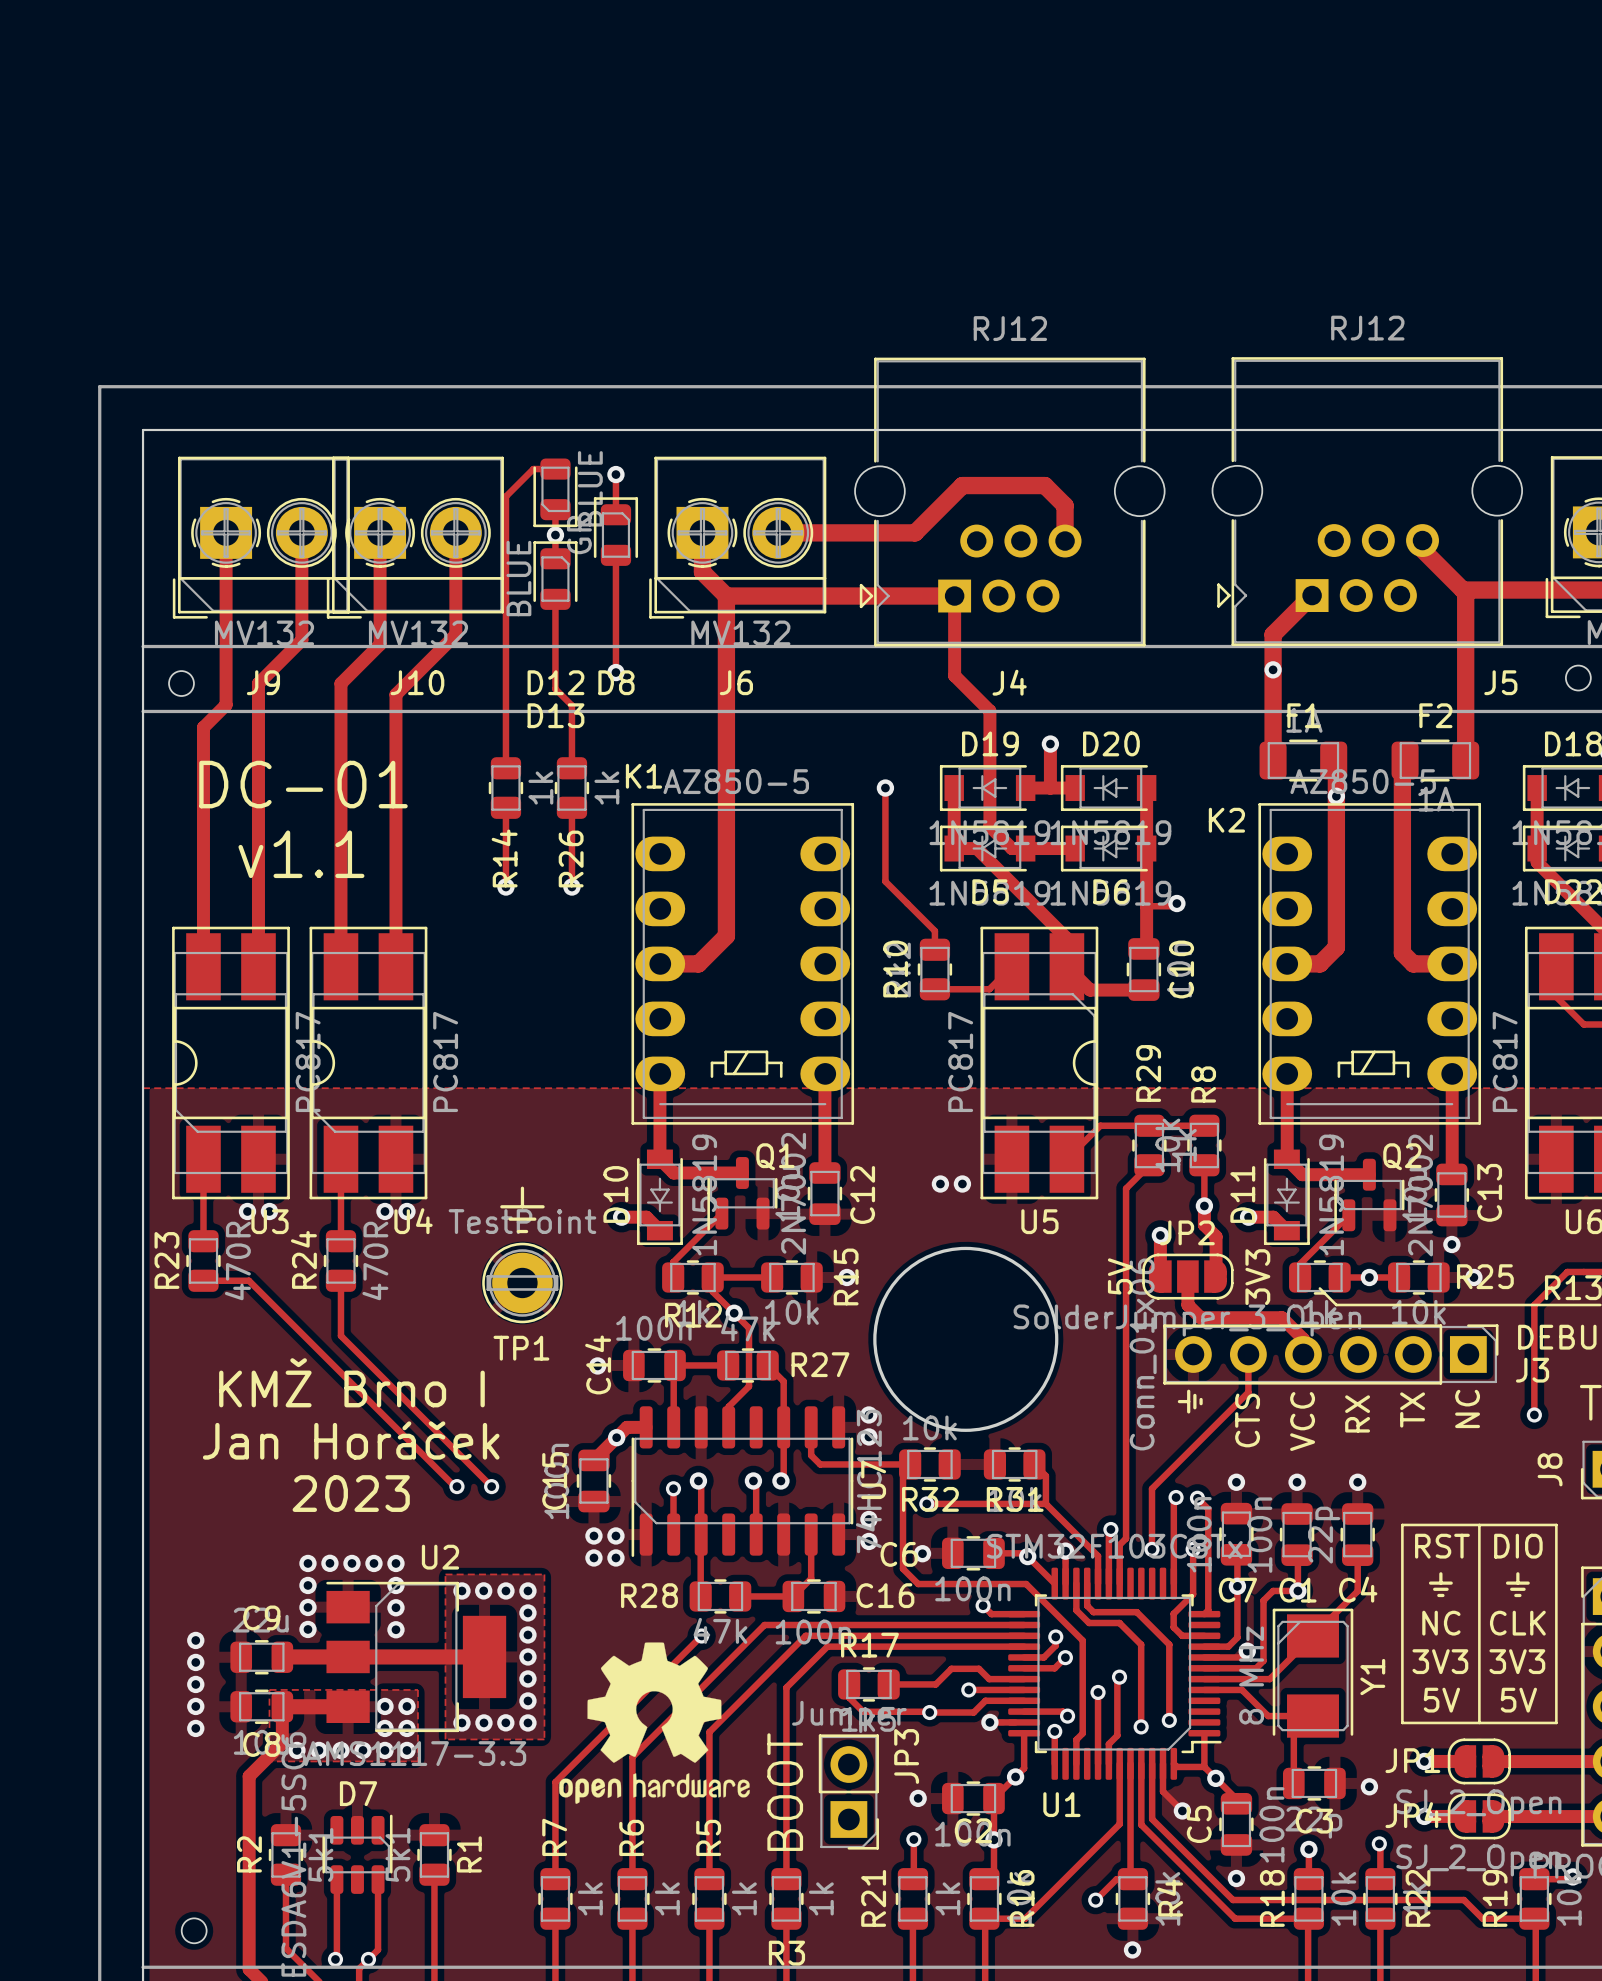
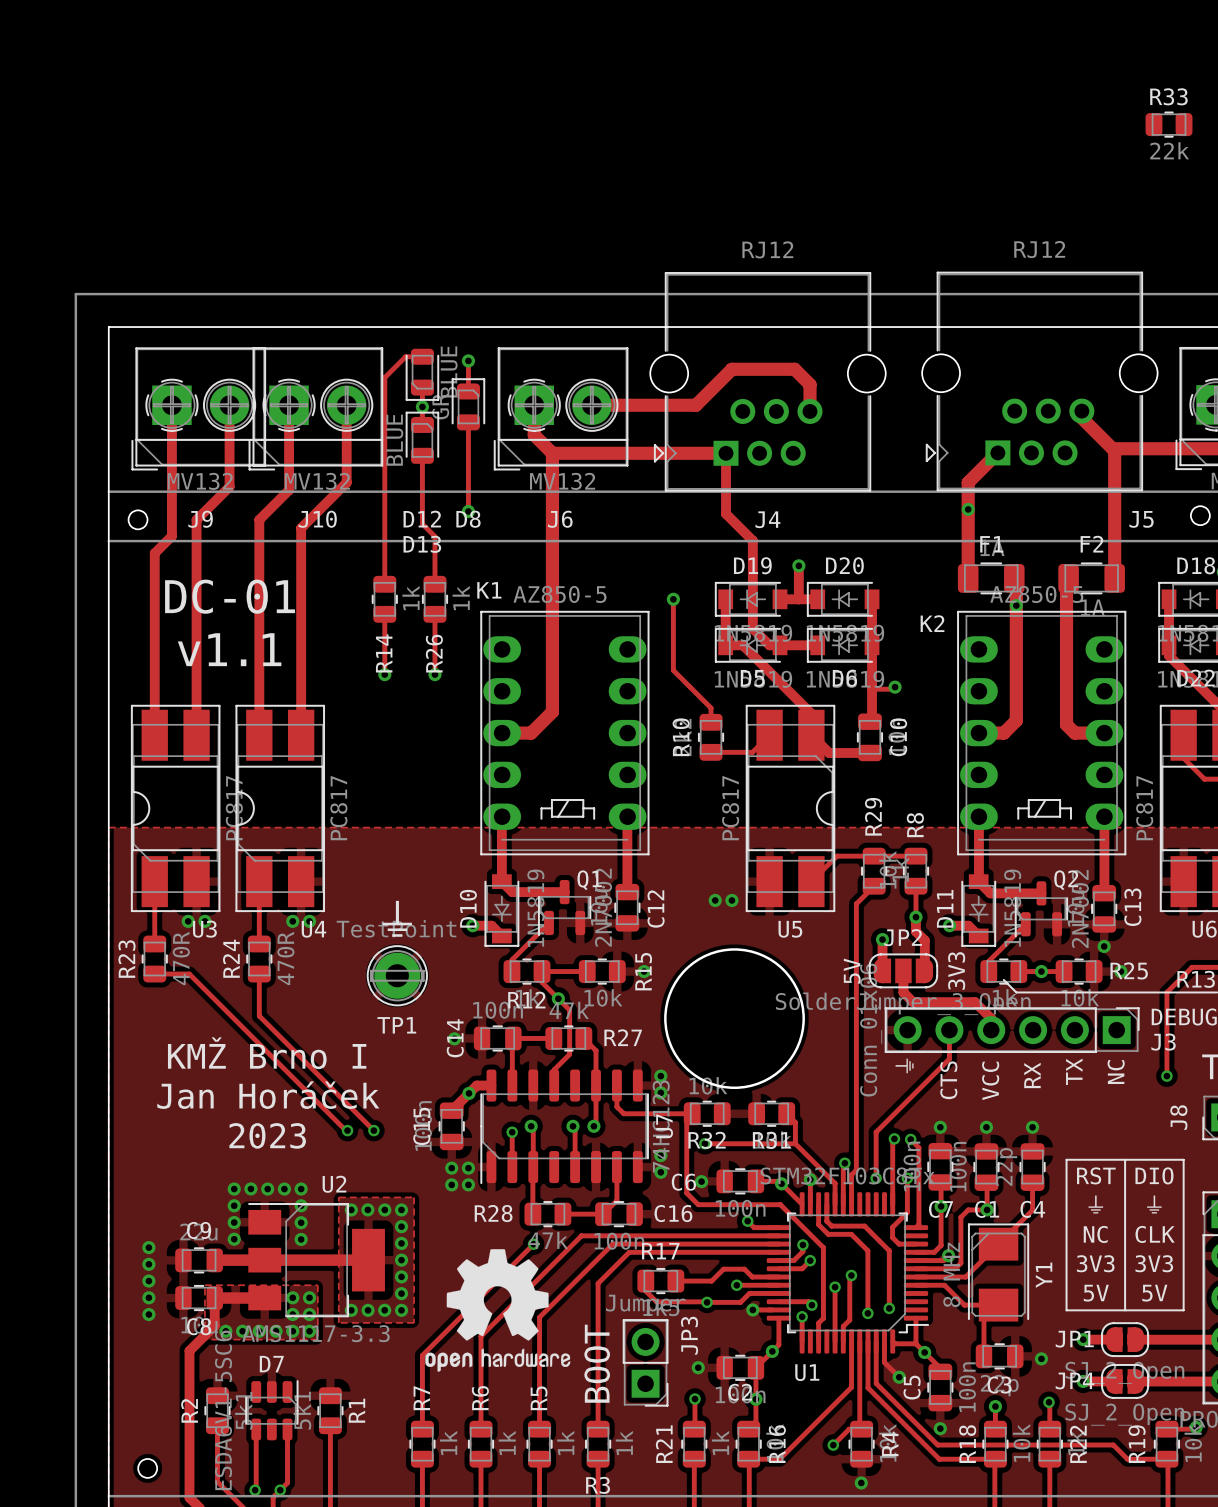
R33: none -> 22k (1169, 124)

